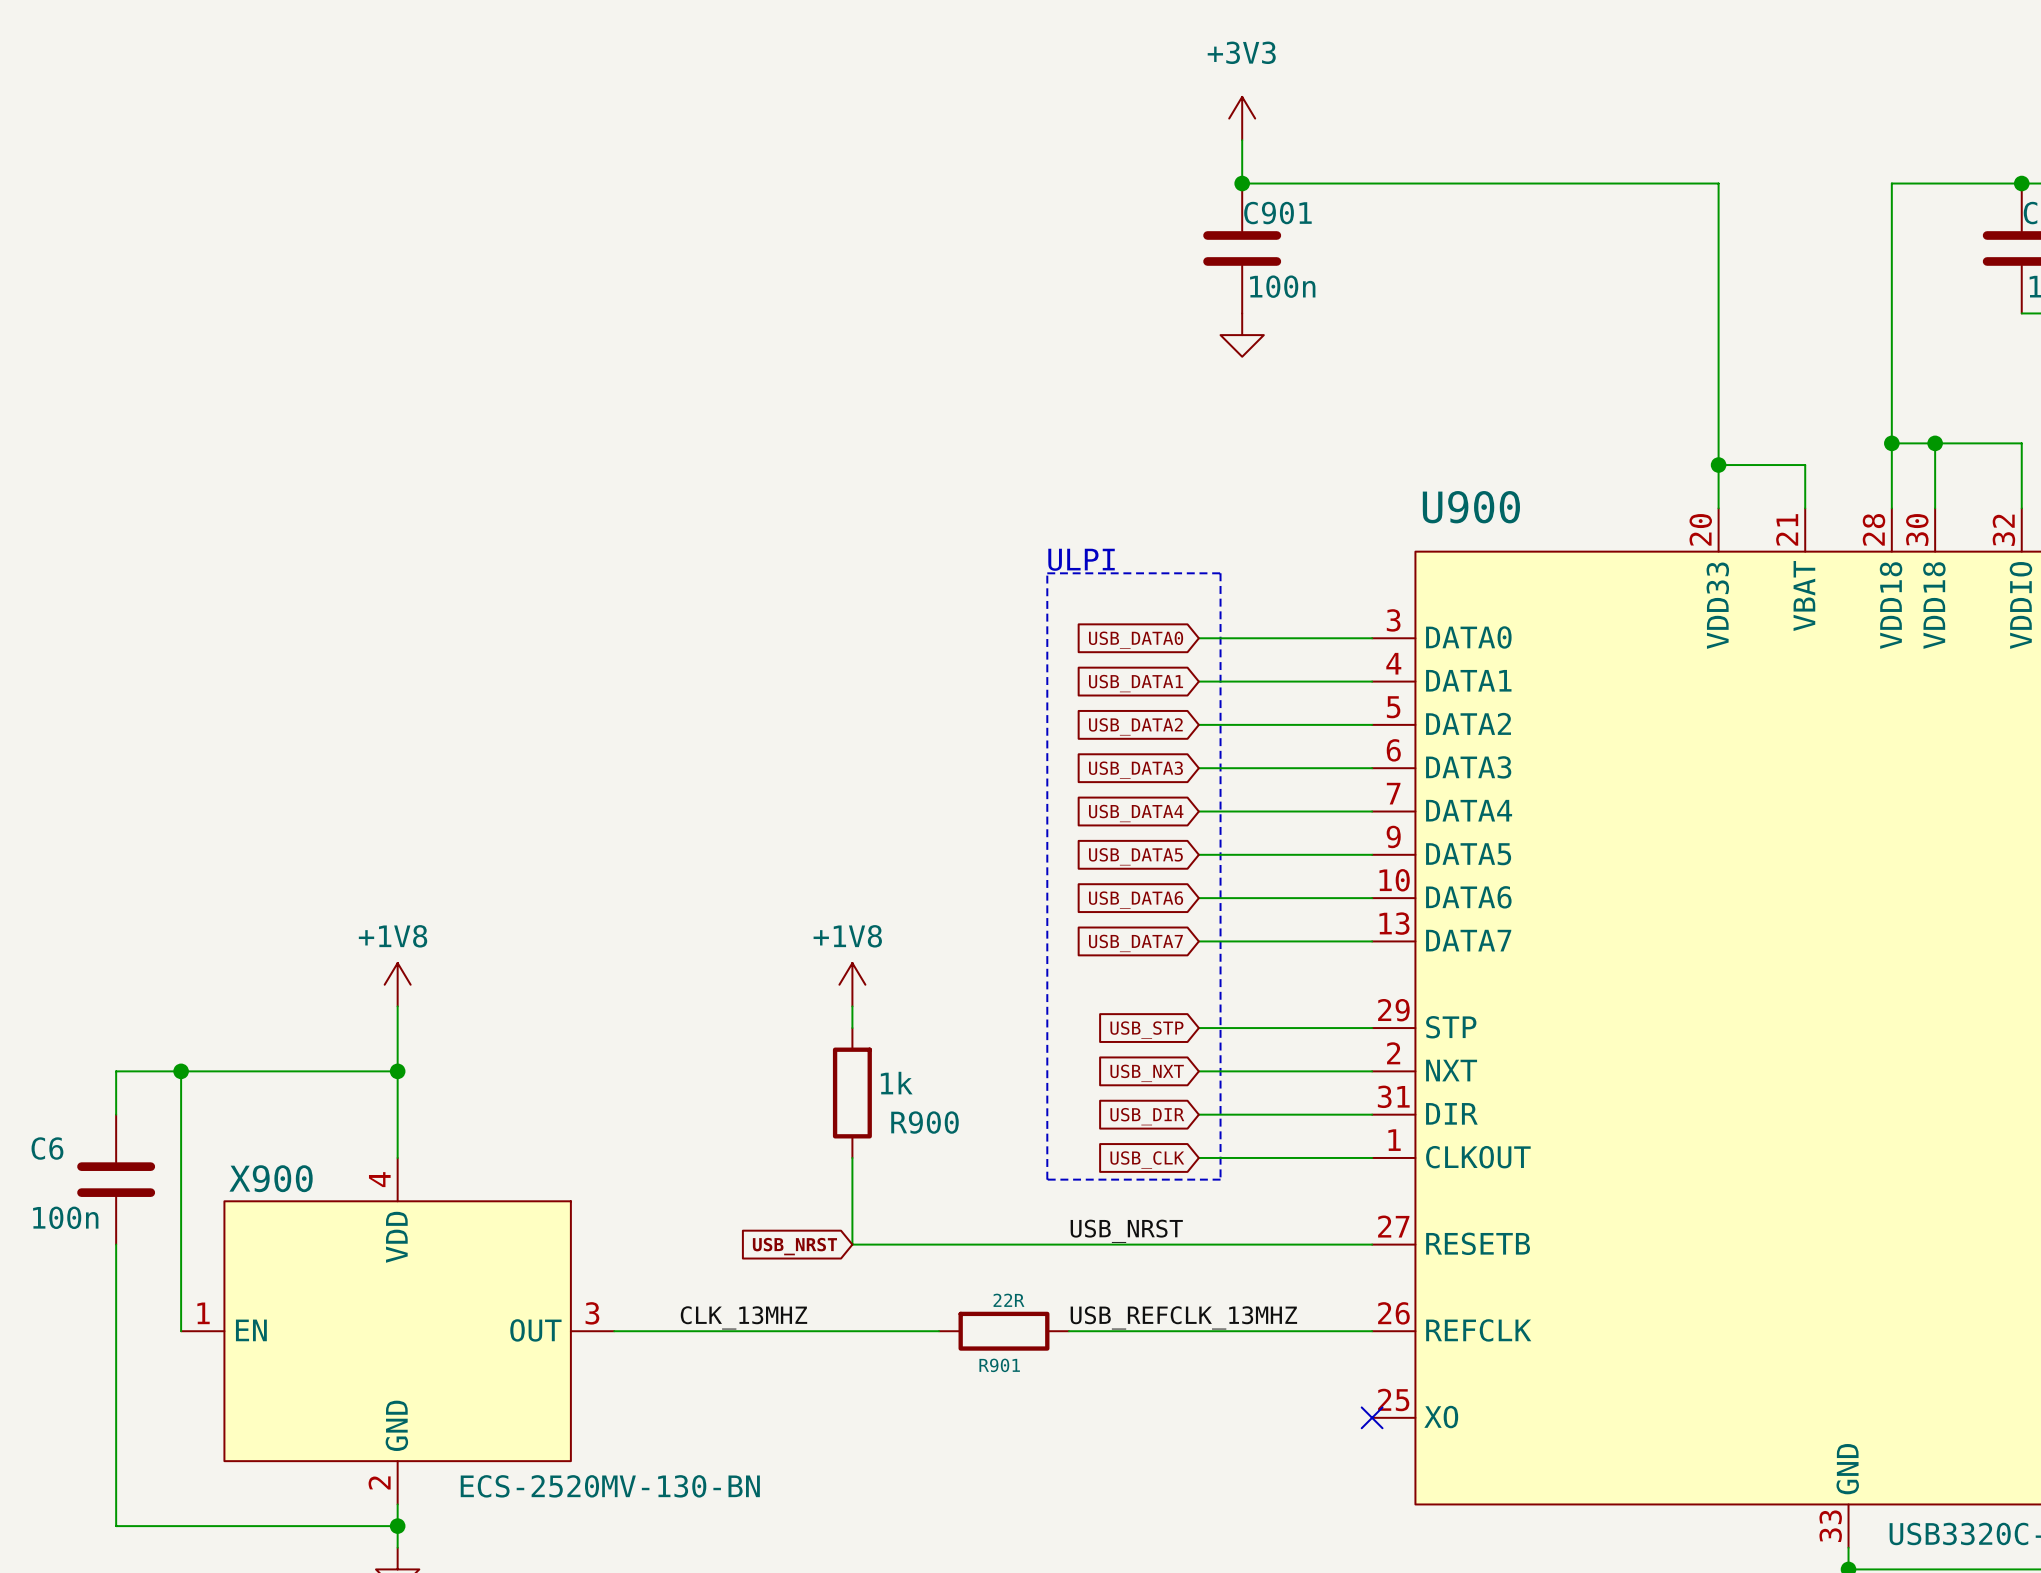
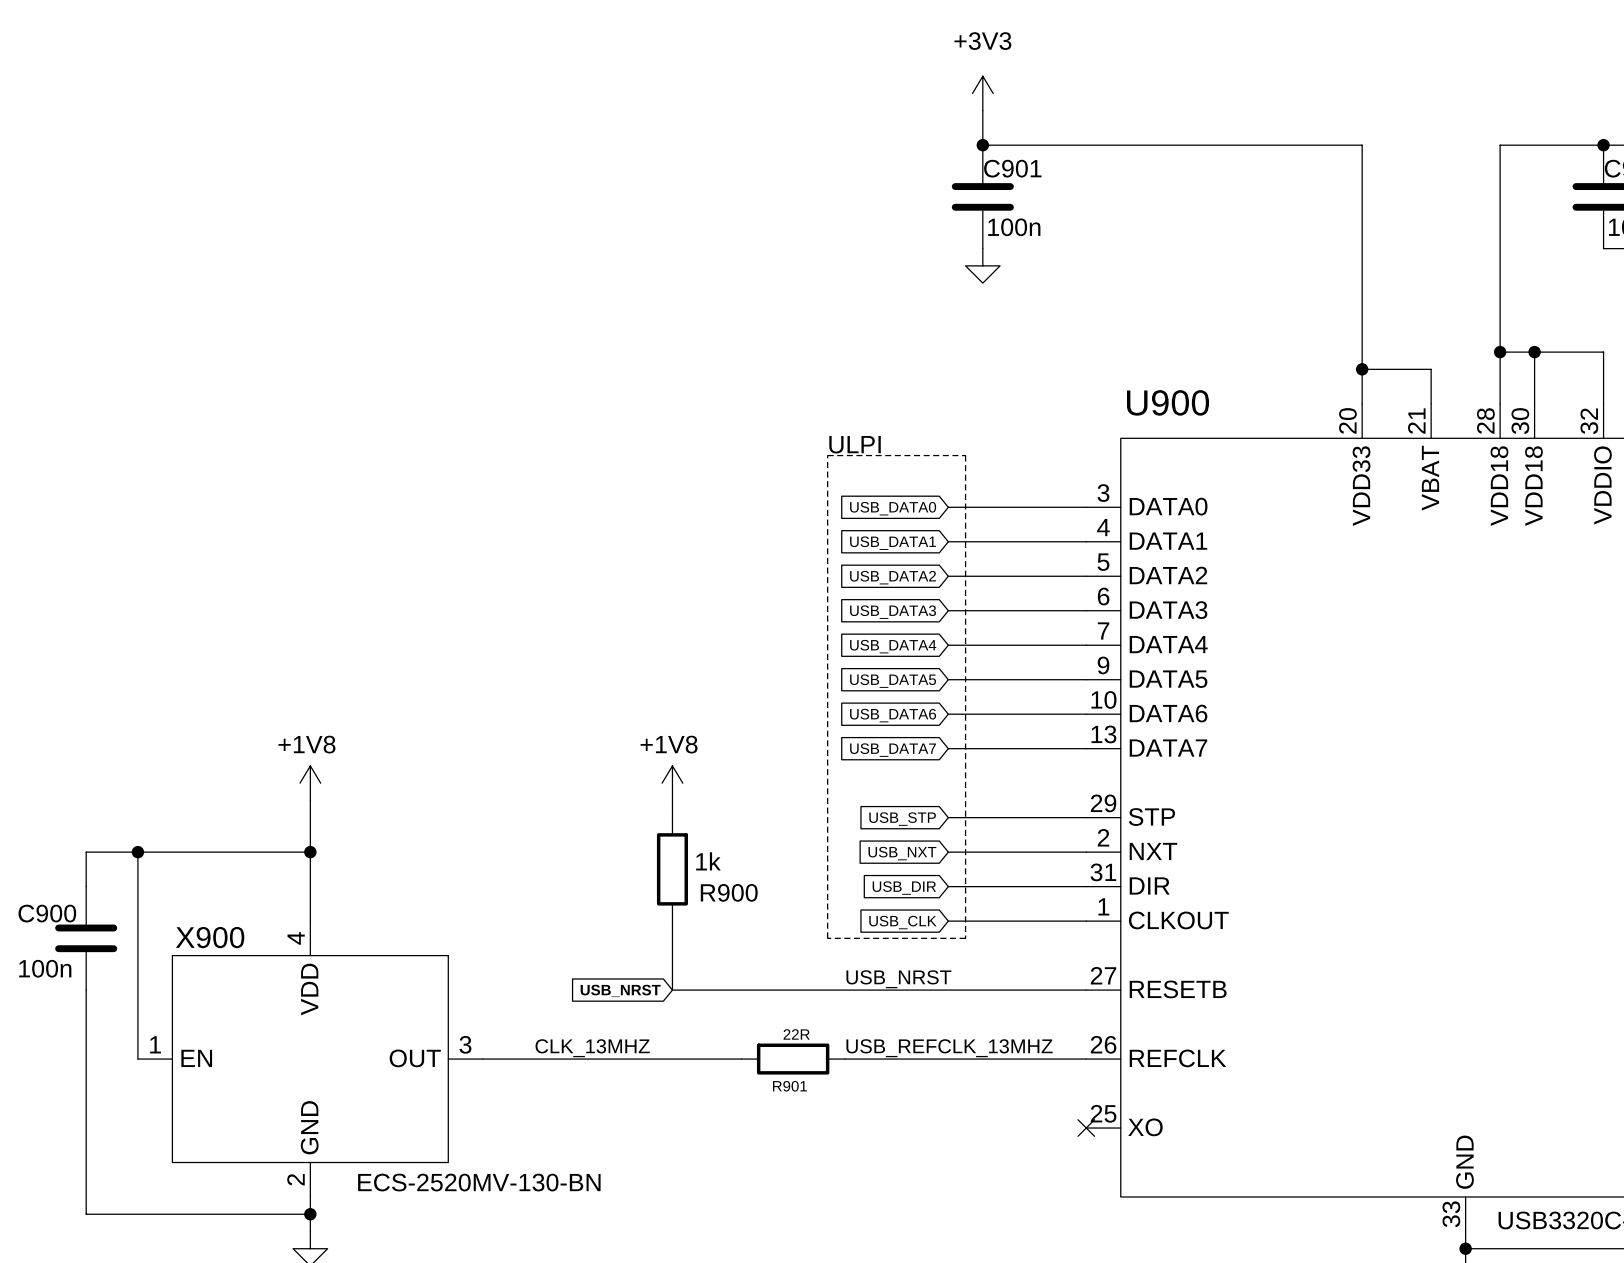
C6 name: C6 (47, 1148) -> C900 (47, 913)

